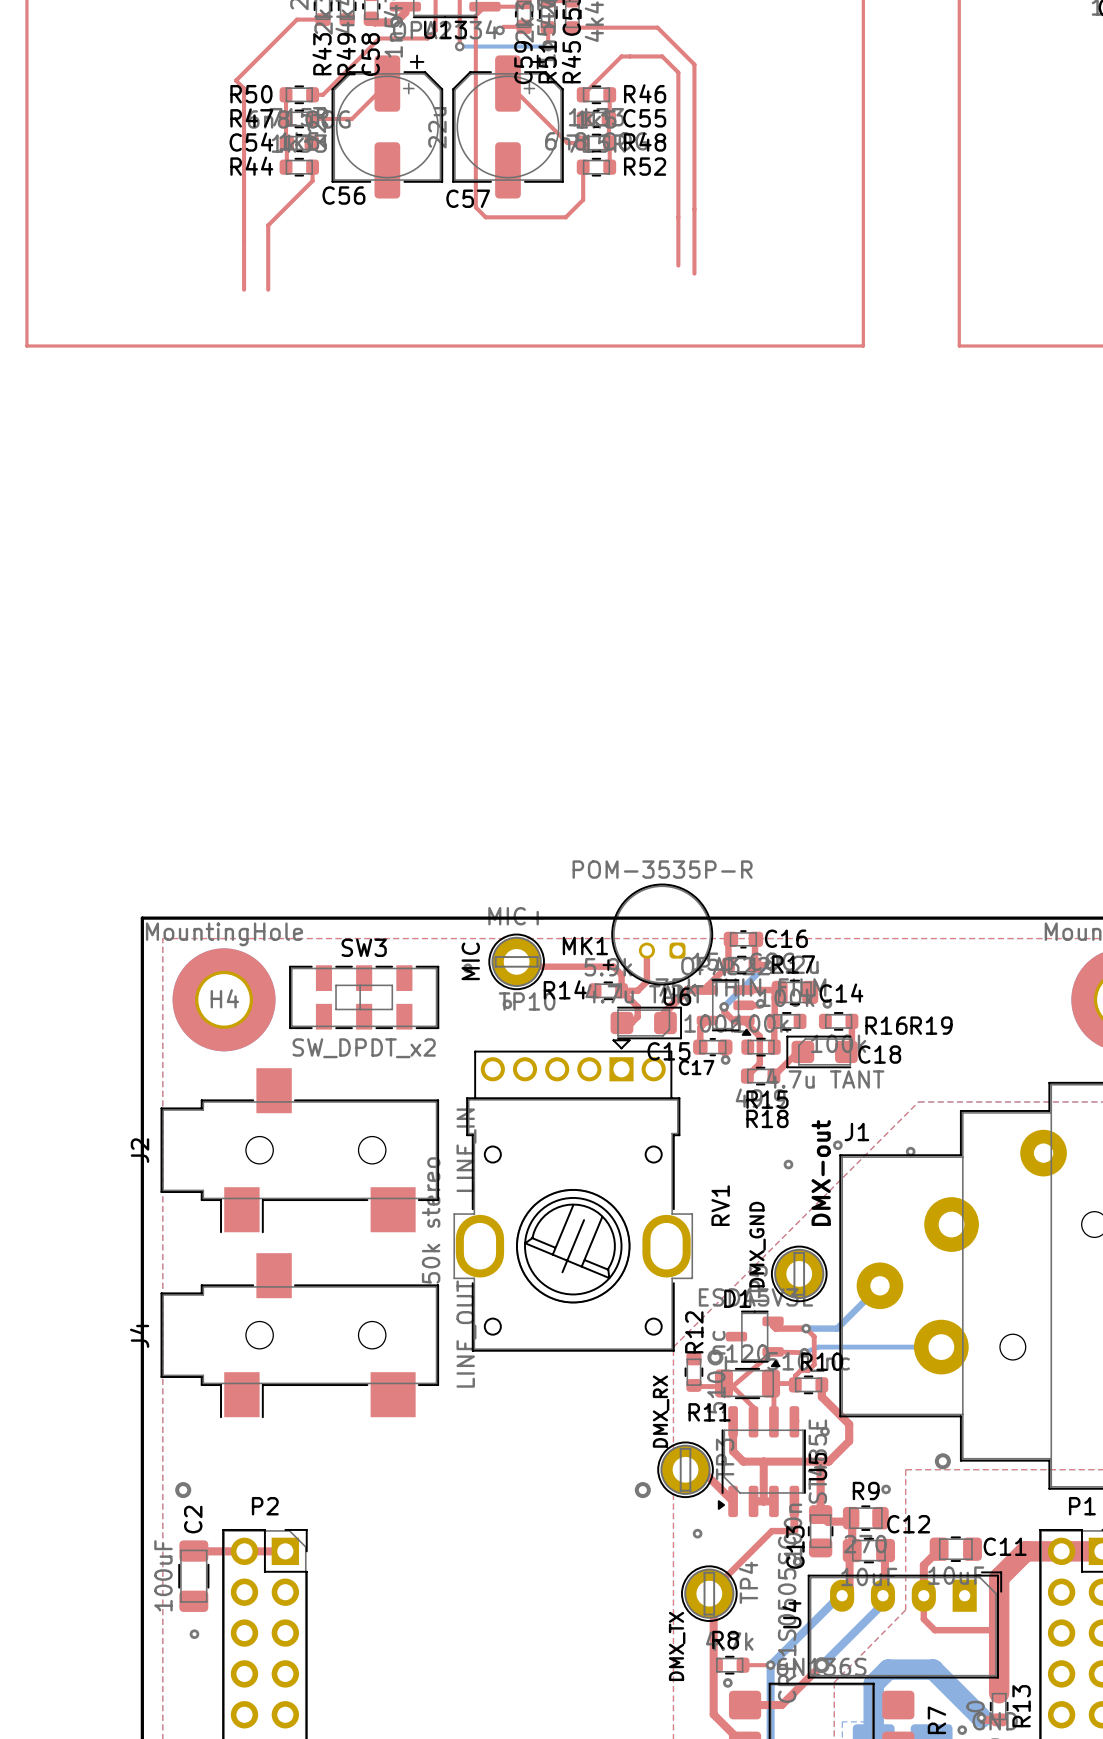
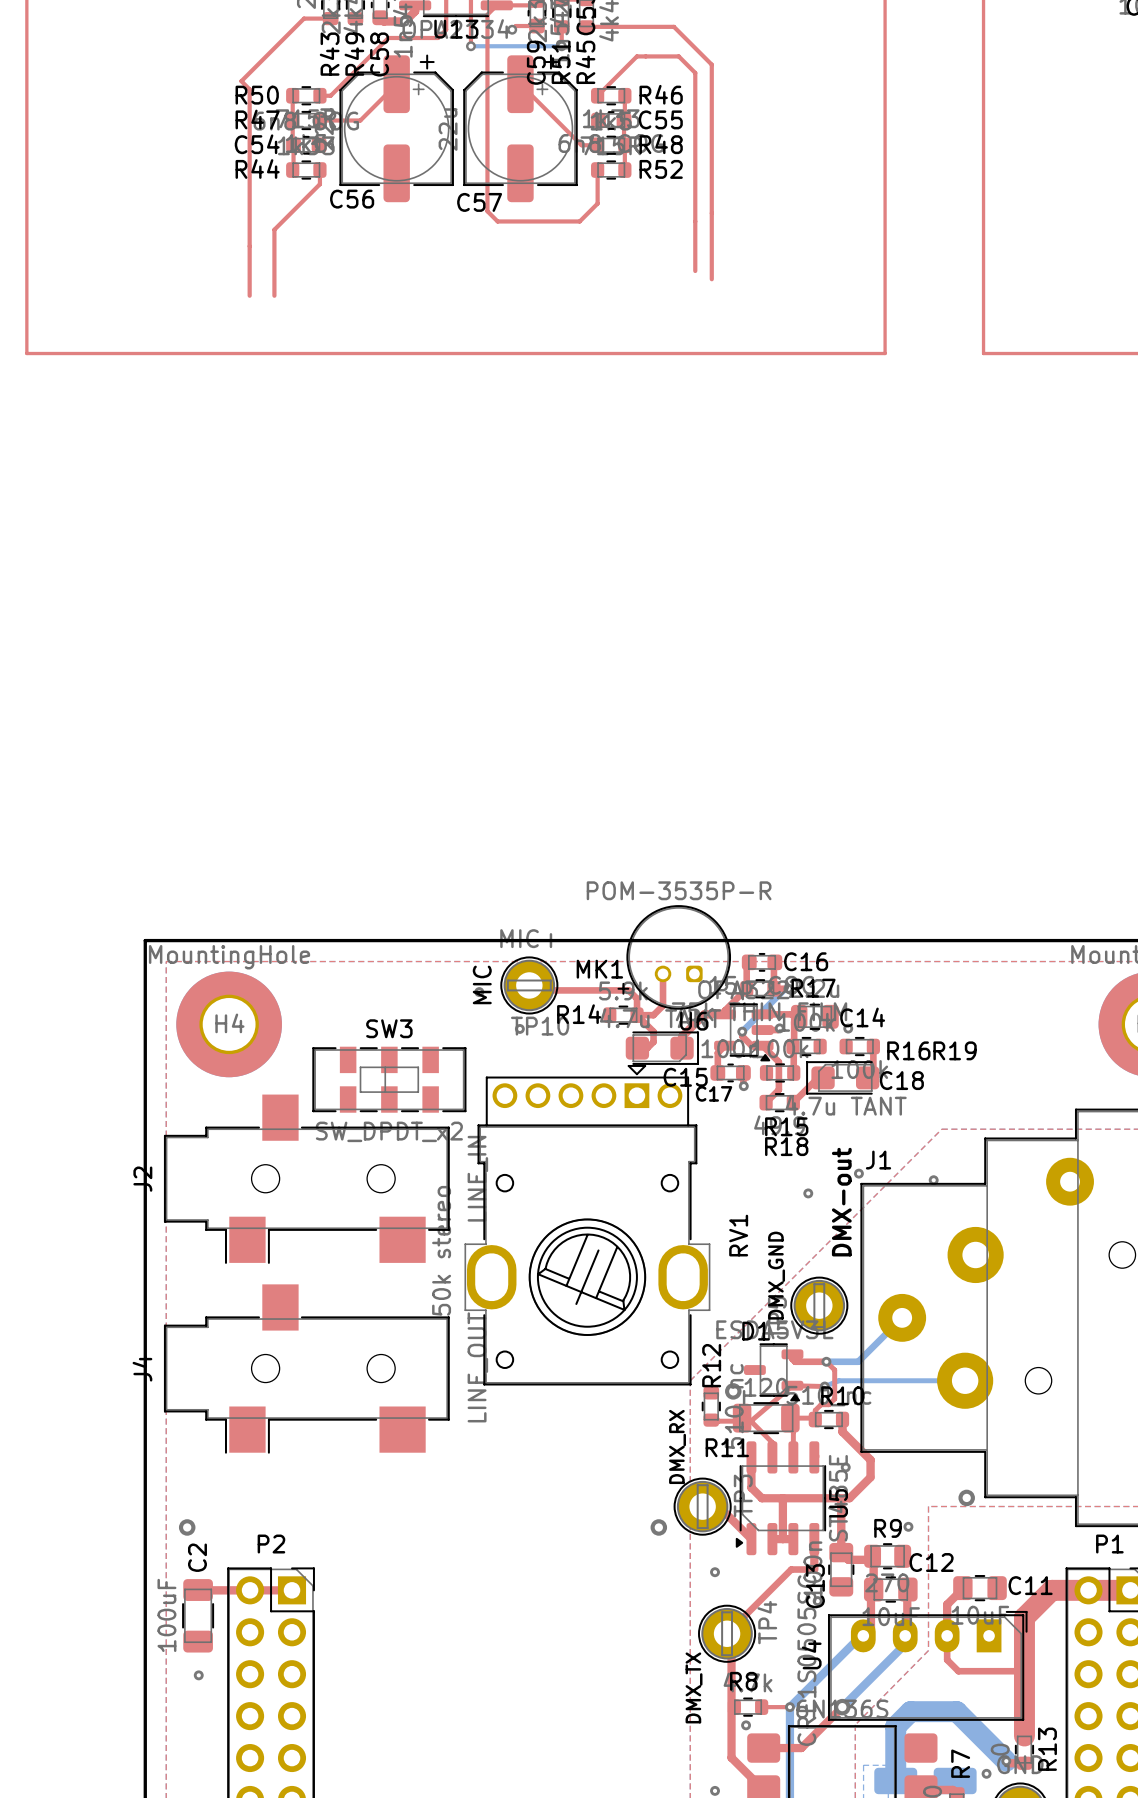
SW3 position: (364, 997) -> (389, 1079)

